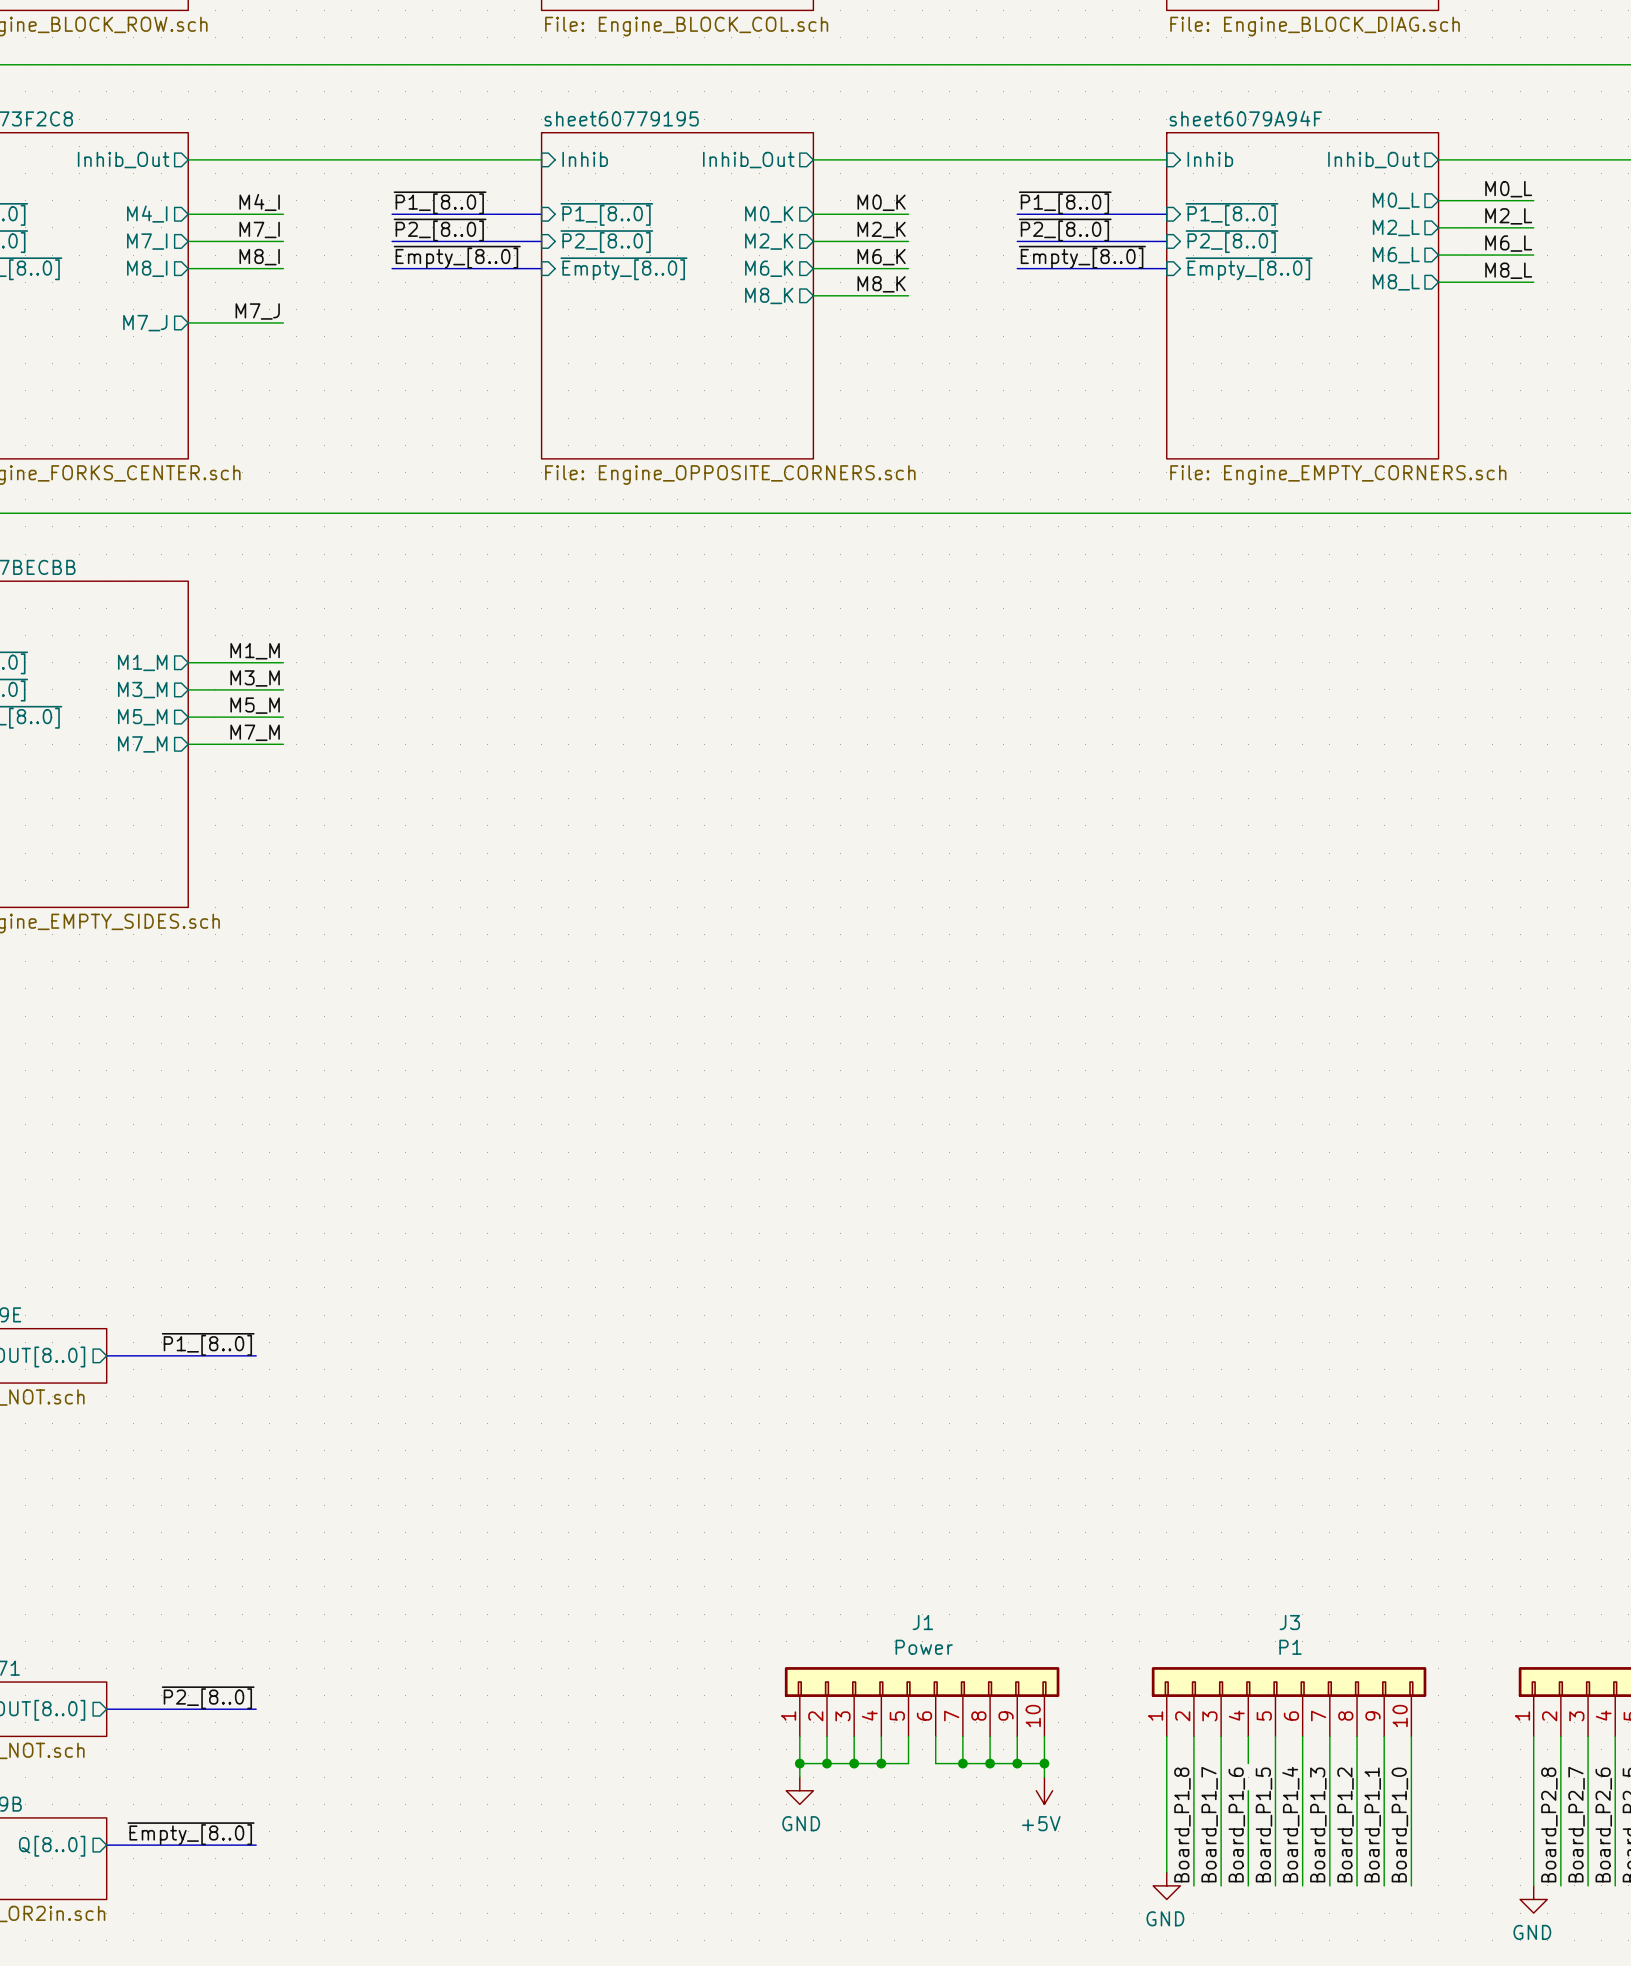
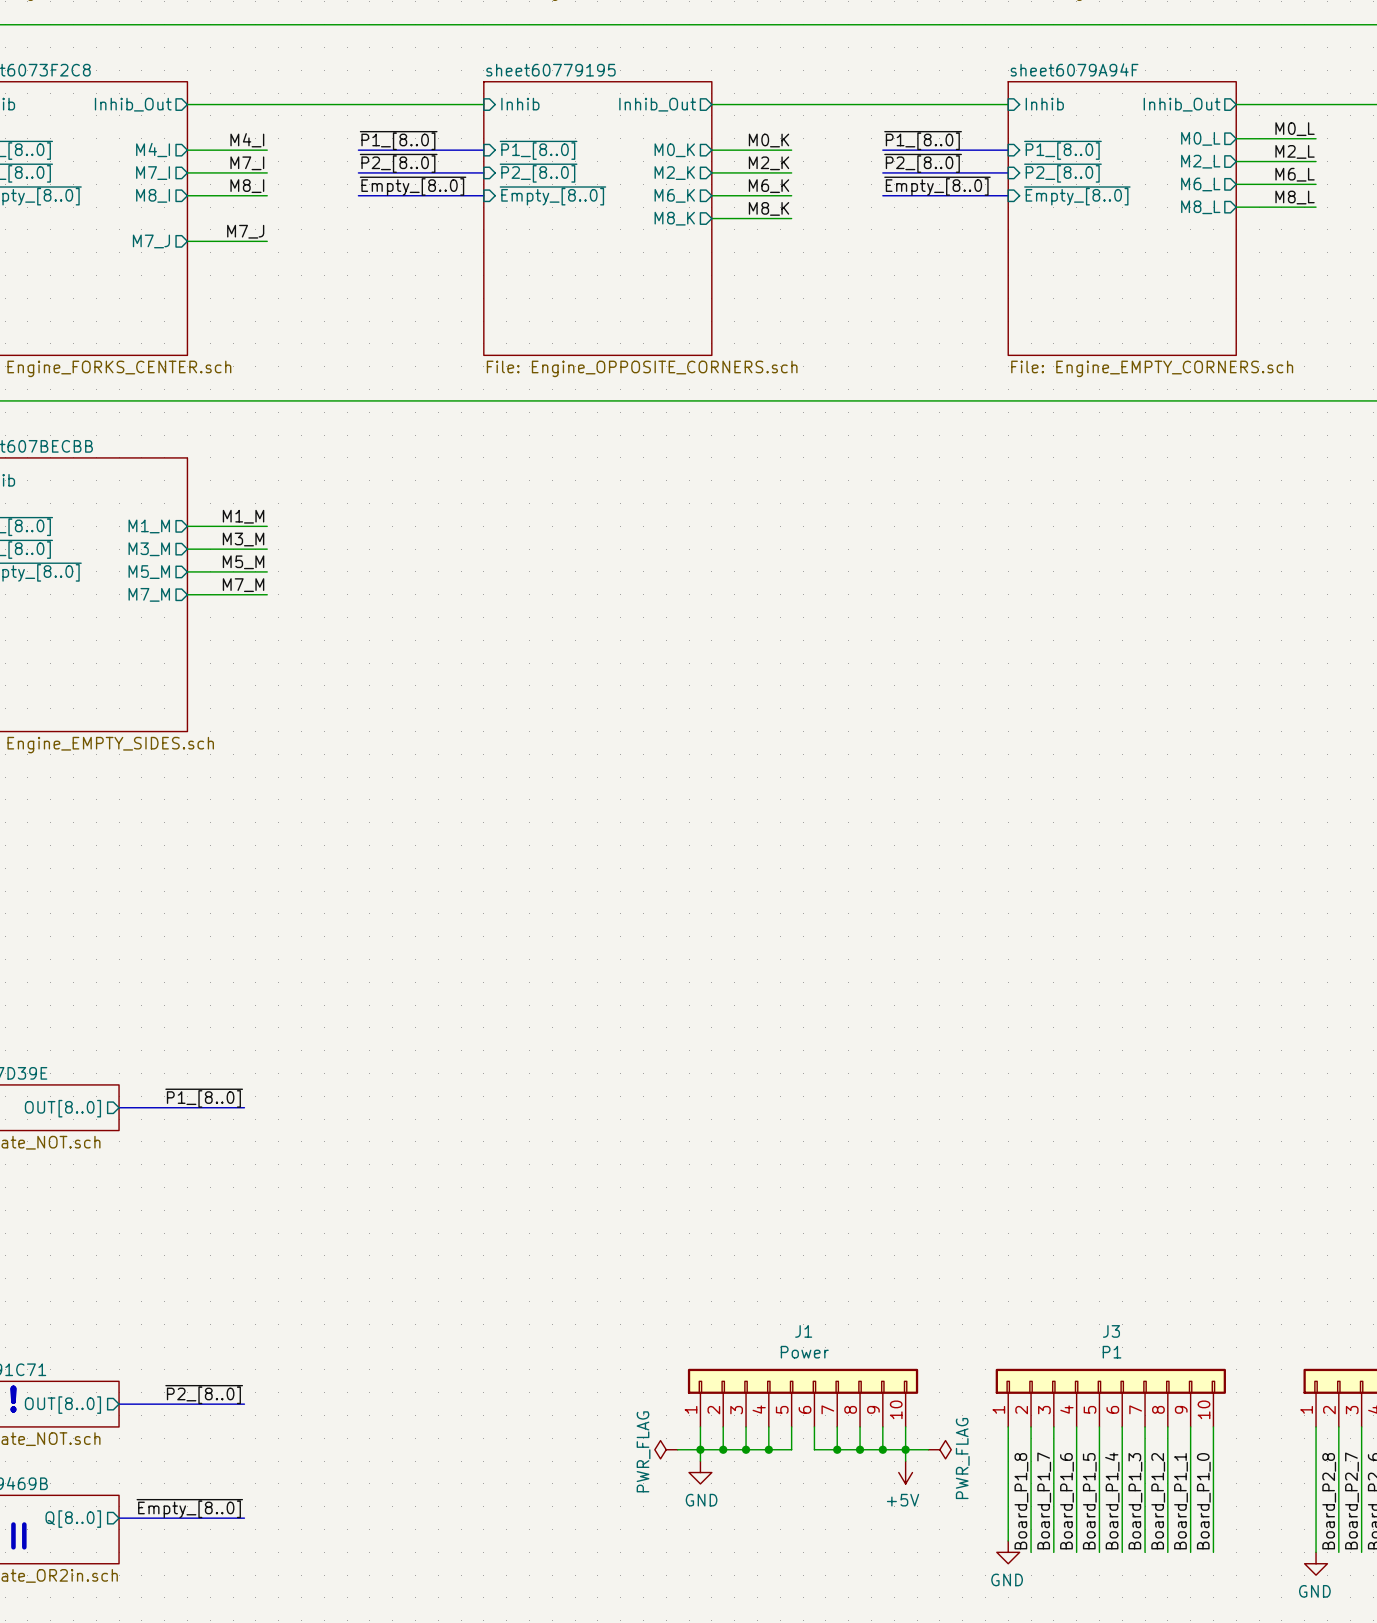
power symbol: none -> PWR_FLAG (666, 1449)
wire: none -> (677, 1449) (700, 1449)
wire: none -> (905, 1449) (928, 1449)
power symbol: none -> PWR_FLAG (939, 1449)
wire: none -> (1076, 1449) (1076, 1472)

